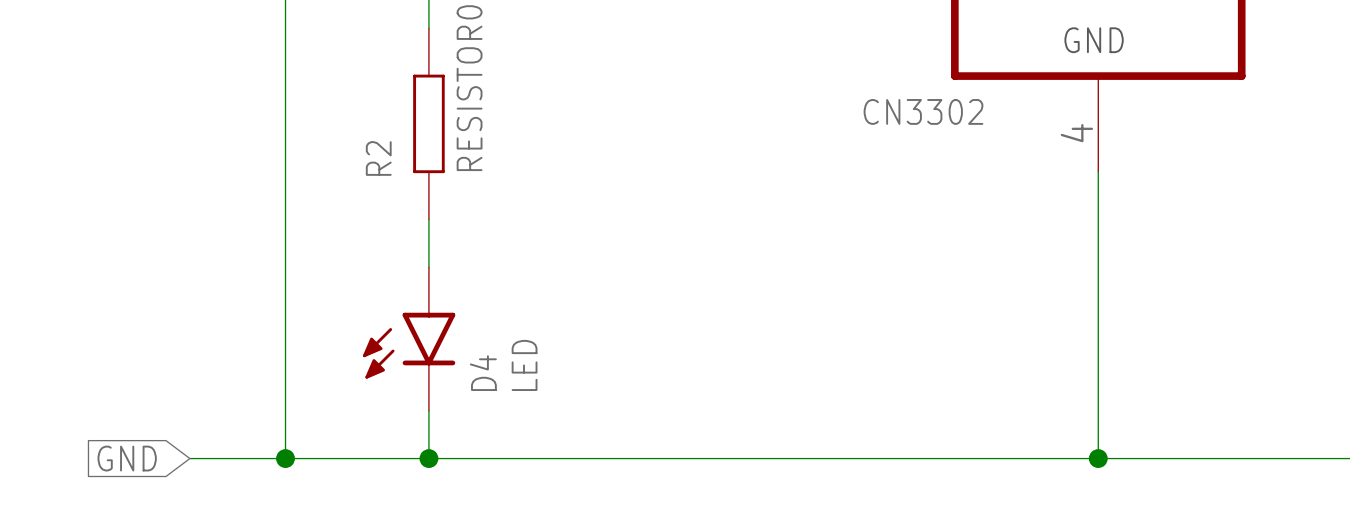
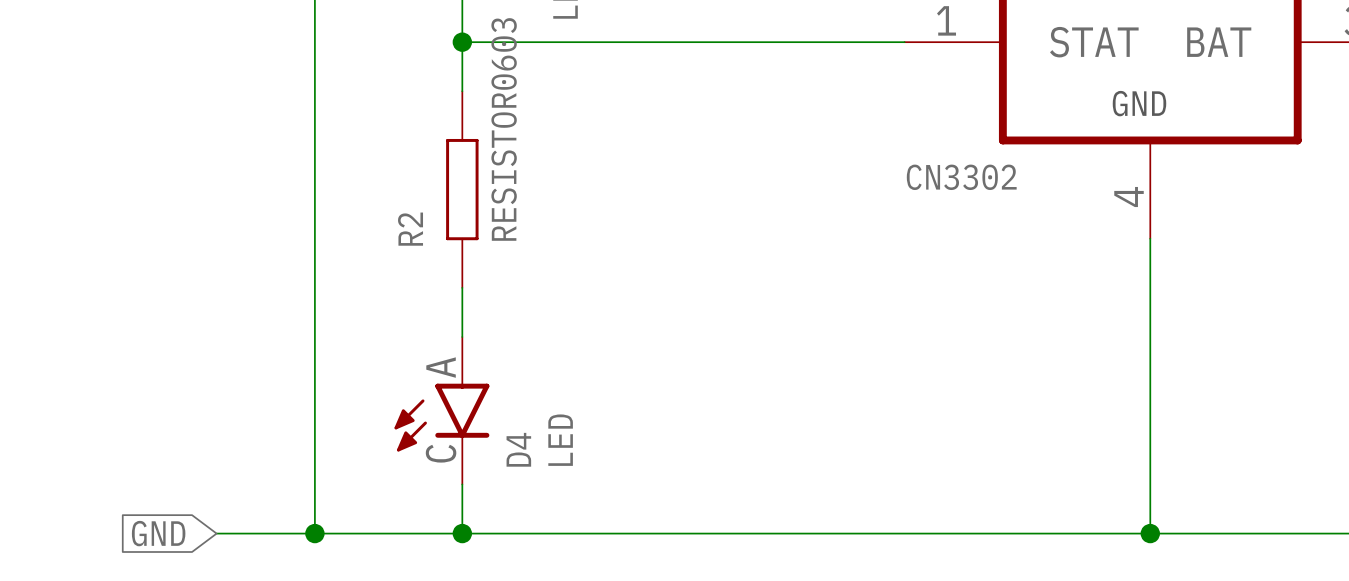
D4 pin number: none -> A (441, 367)
D4 pin number: none -> C (441, 453)

